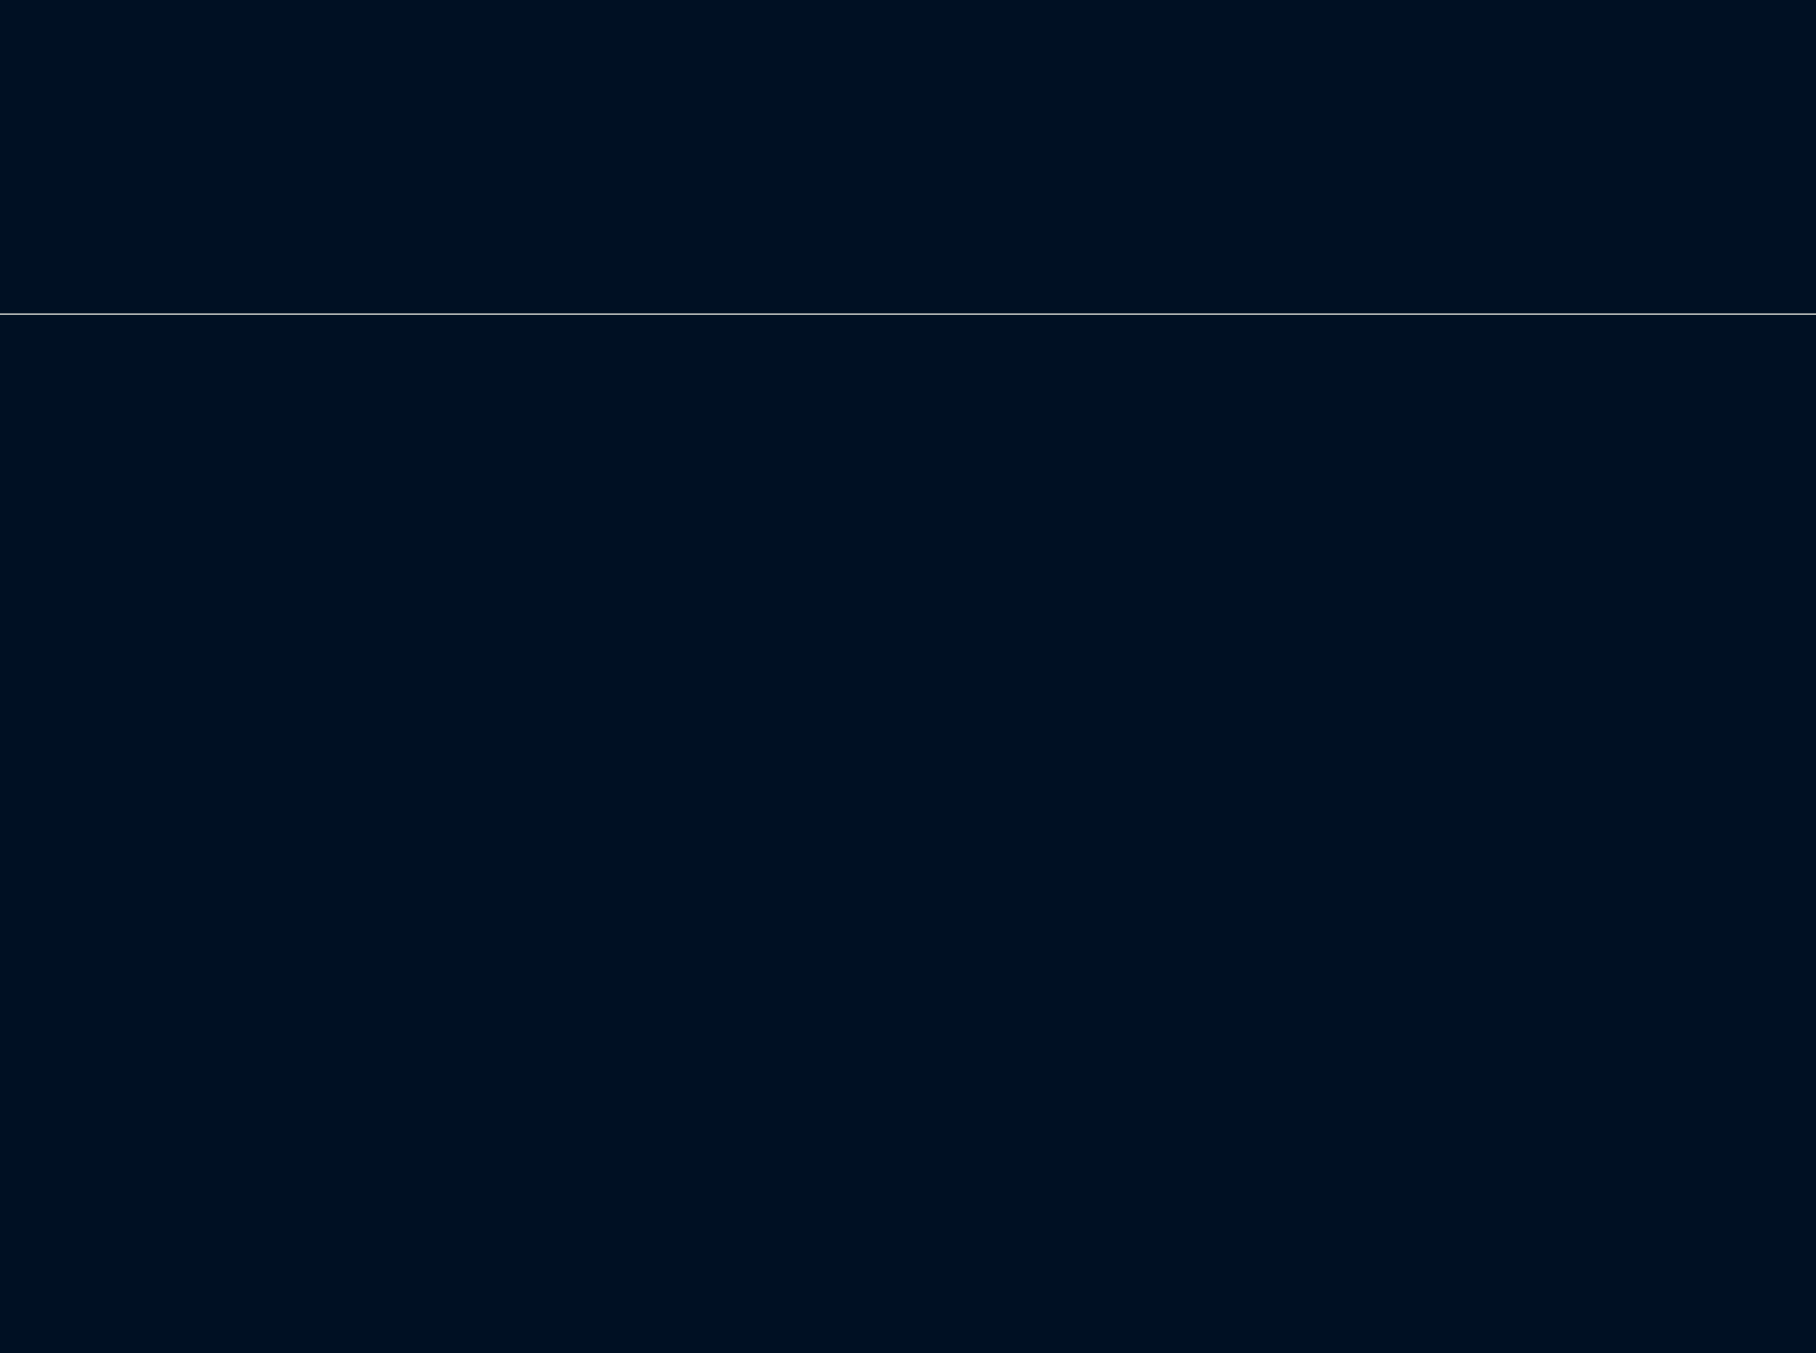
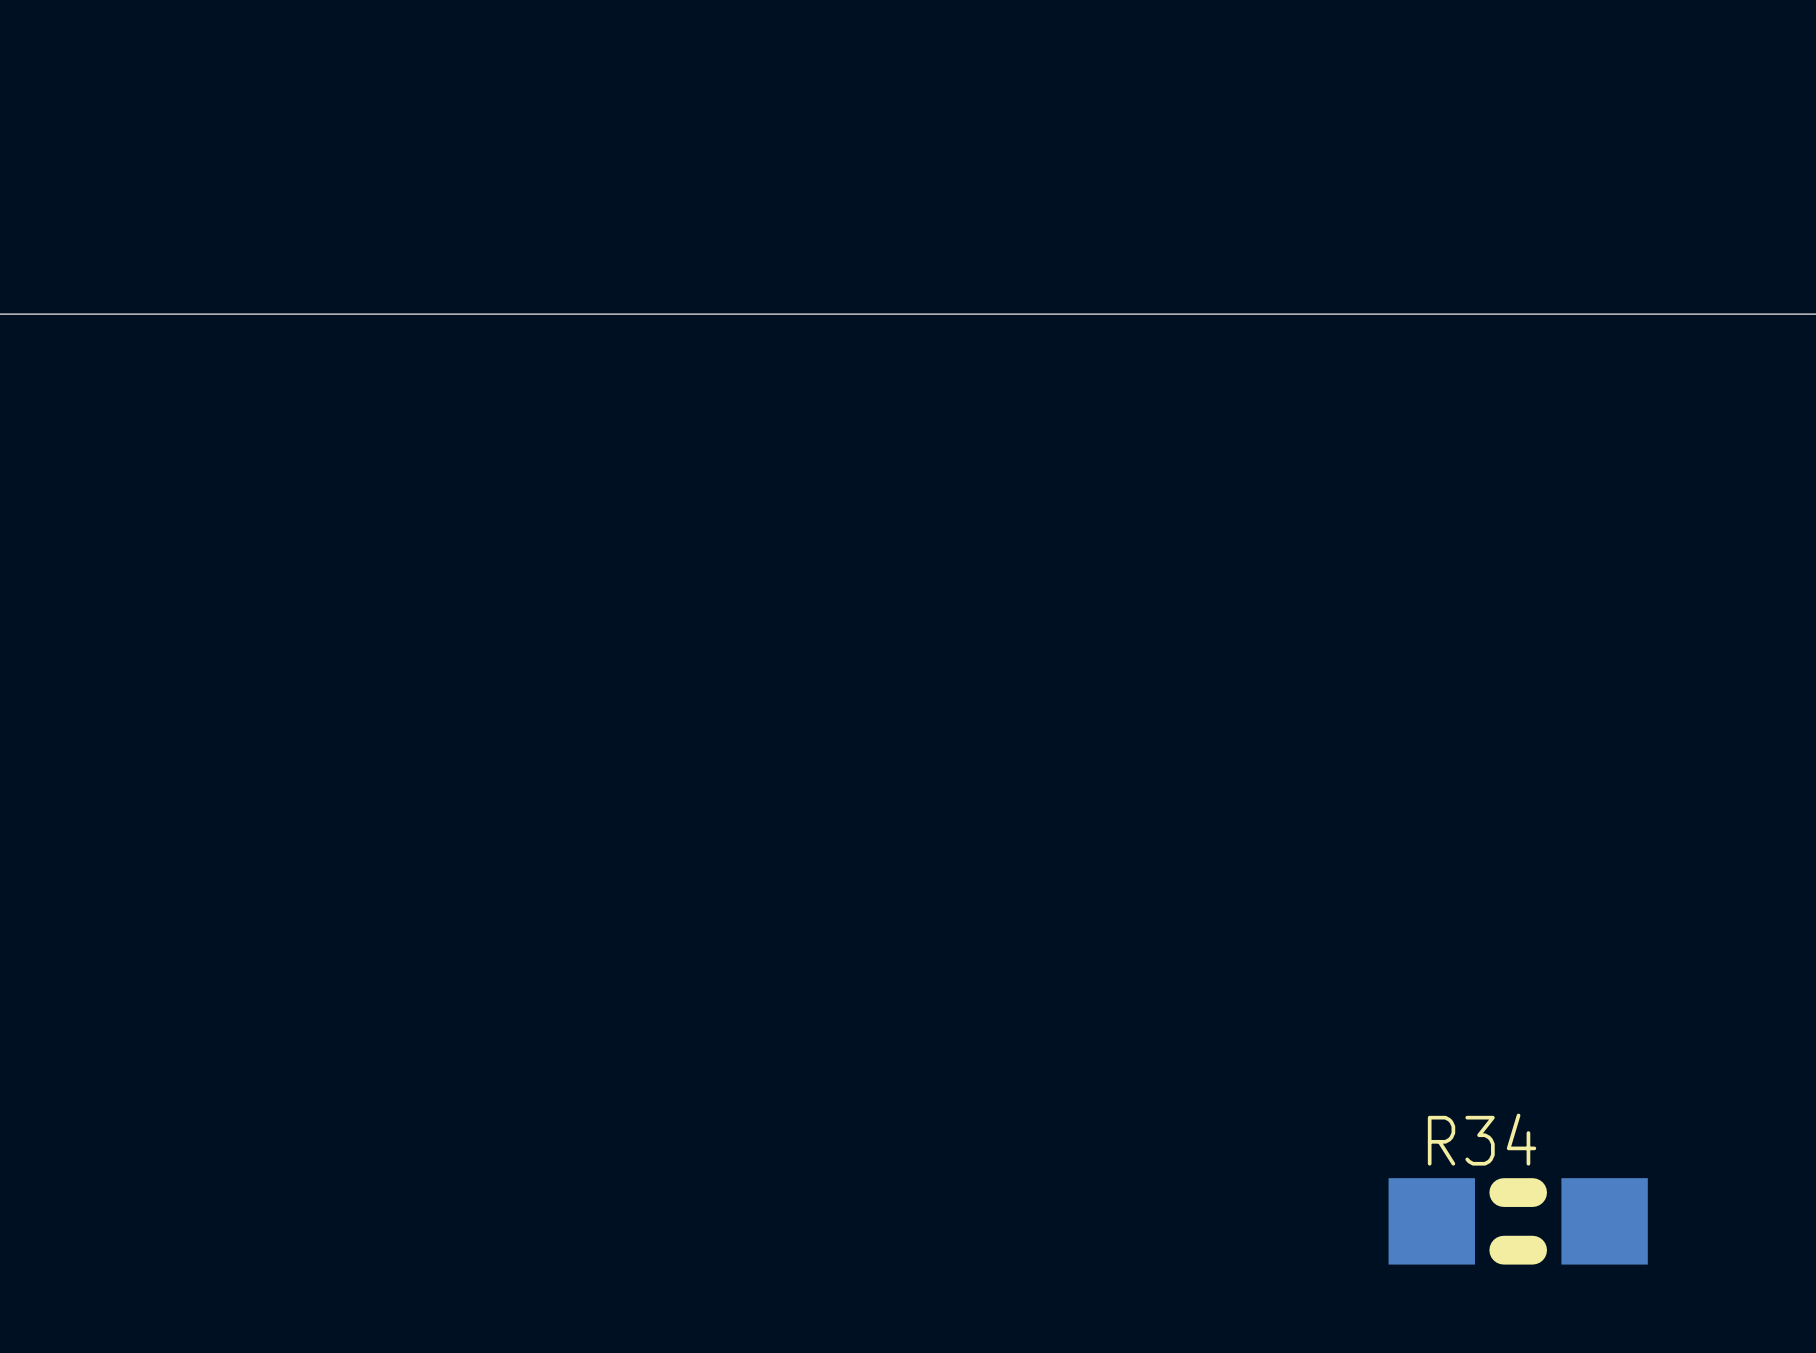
R34: none -> (1518, 1221)

